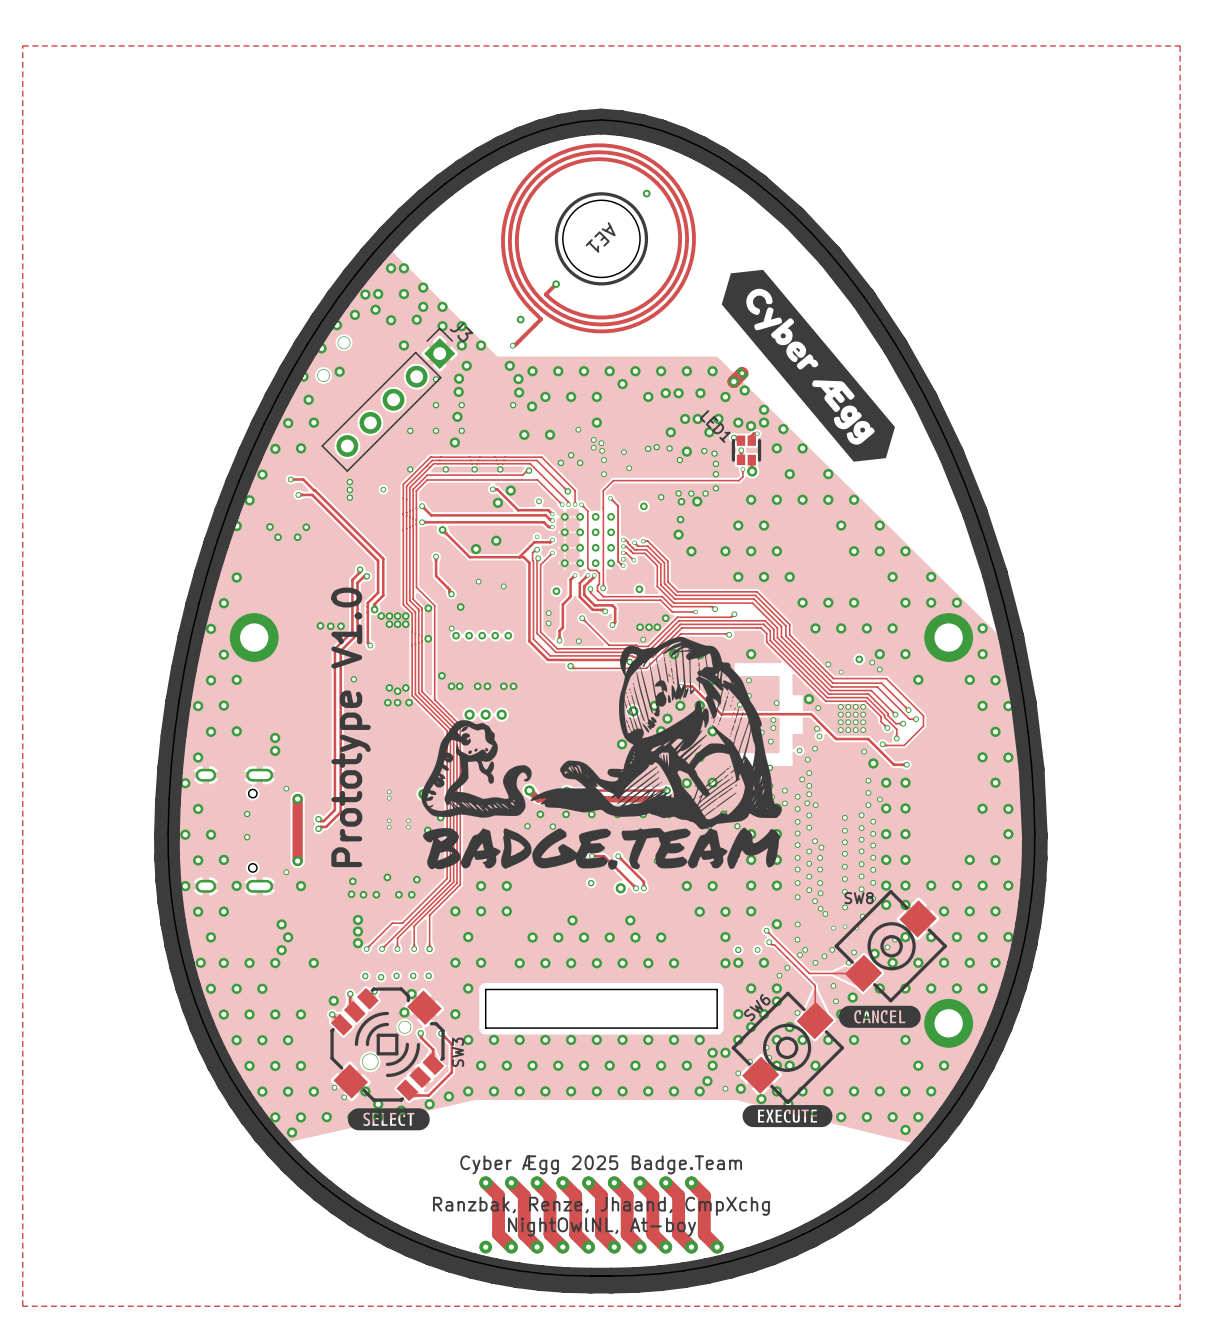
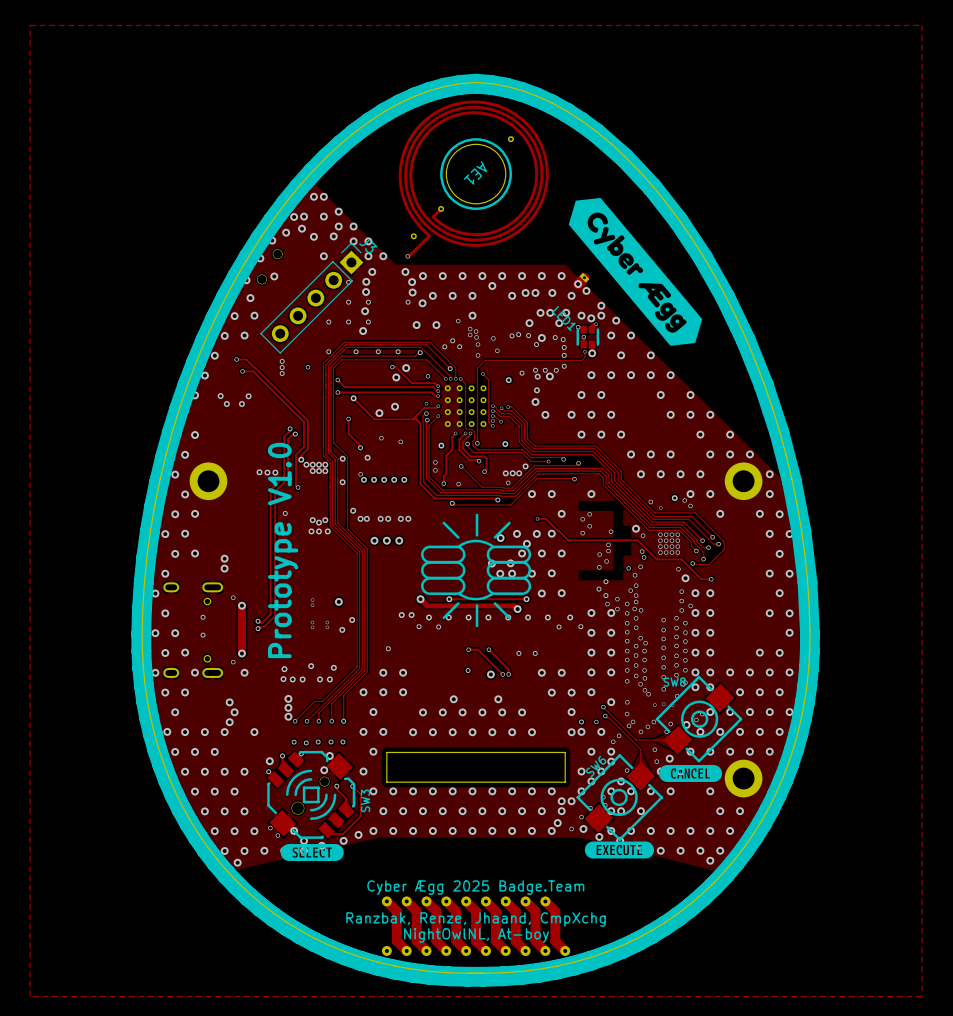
drawing shape: [421, 636, 782, 870] -> [421, 513, 532, 628]

